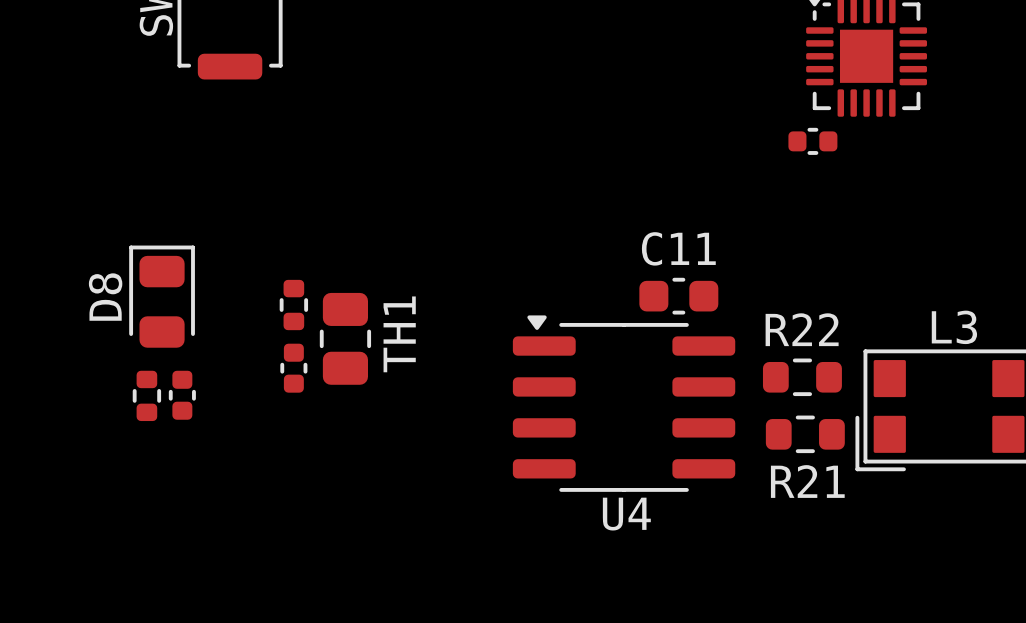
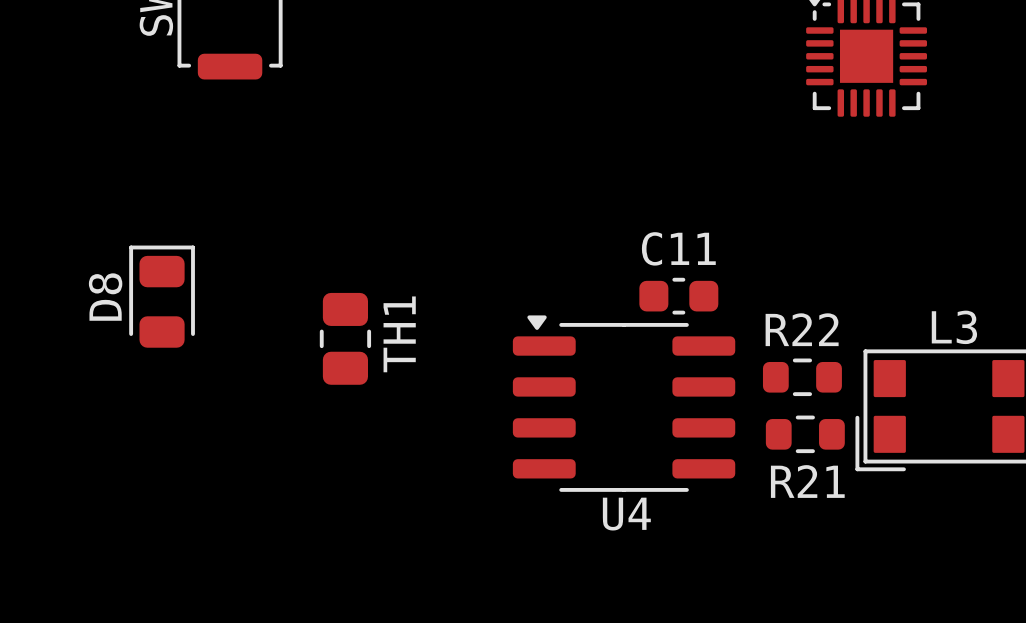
part: (812, 141) -> none
part: (293, 305) -> none
part: (293, 368) -> none
part: (146, 395) -> none
part: (182, 395) -> none

